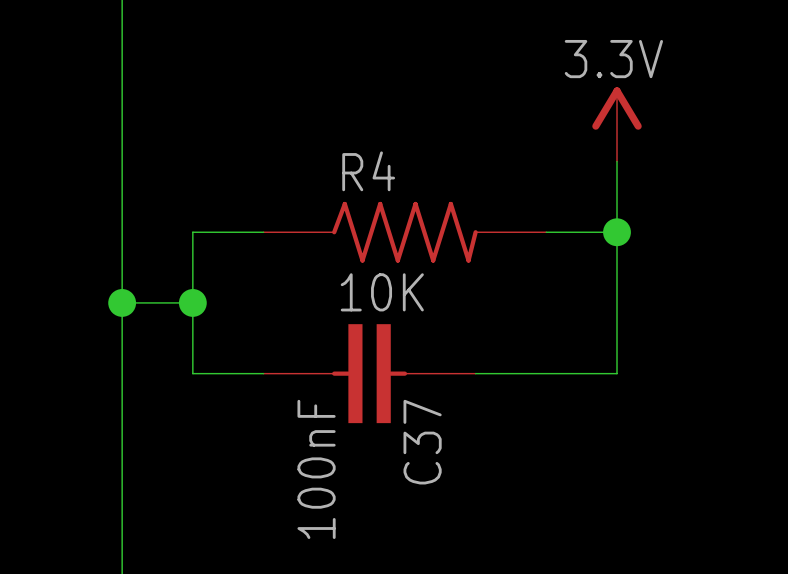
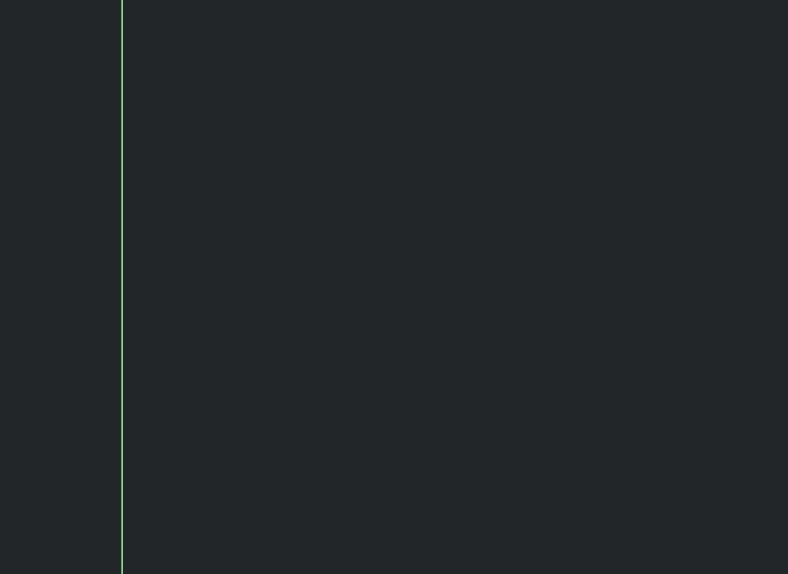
power symbol: 3.3V (617, 124) -> none
wire: (617, 161) (617, 373) (475, 373) -> none
wire: (263, 232) (192, 232) (192, 373) (263, 373) -> none
R4: 10K (404, 232) -> none
wire: (546, 232) (617, 232) -> none
junction: (617, 232) -> none
wire: (122, 302) (192, 302) -> none
junction: (122, 302) -> none
junction: (192, 302) -> none
C37: 100nF (369, 373) -> none

